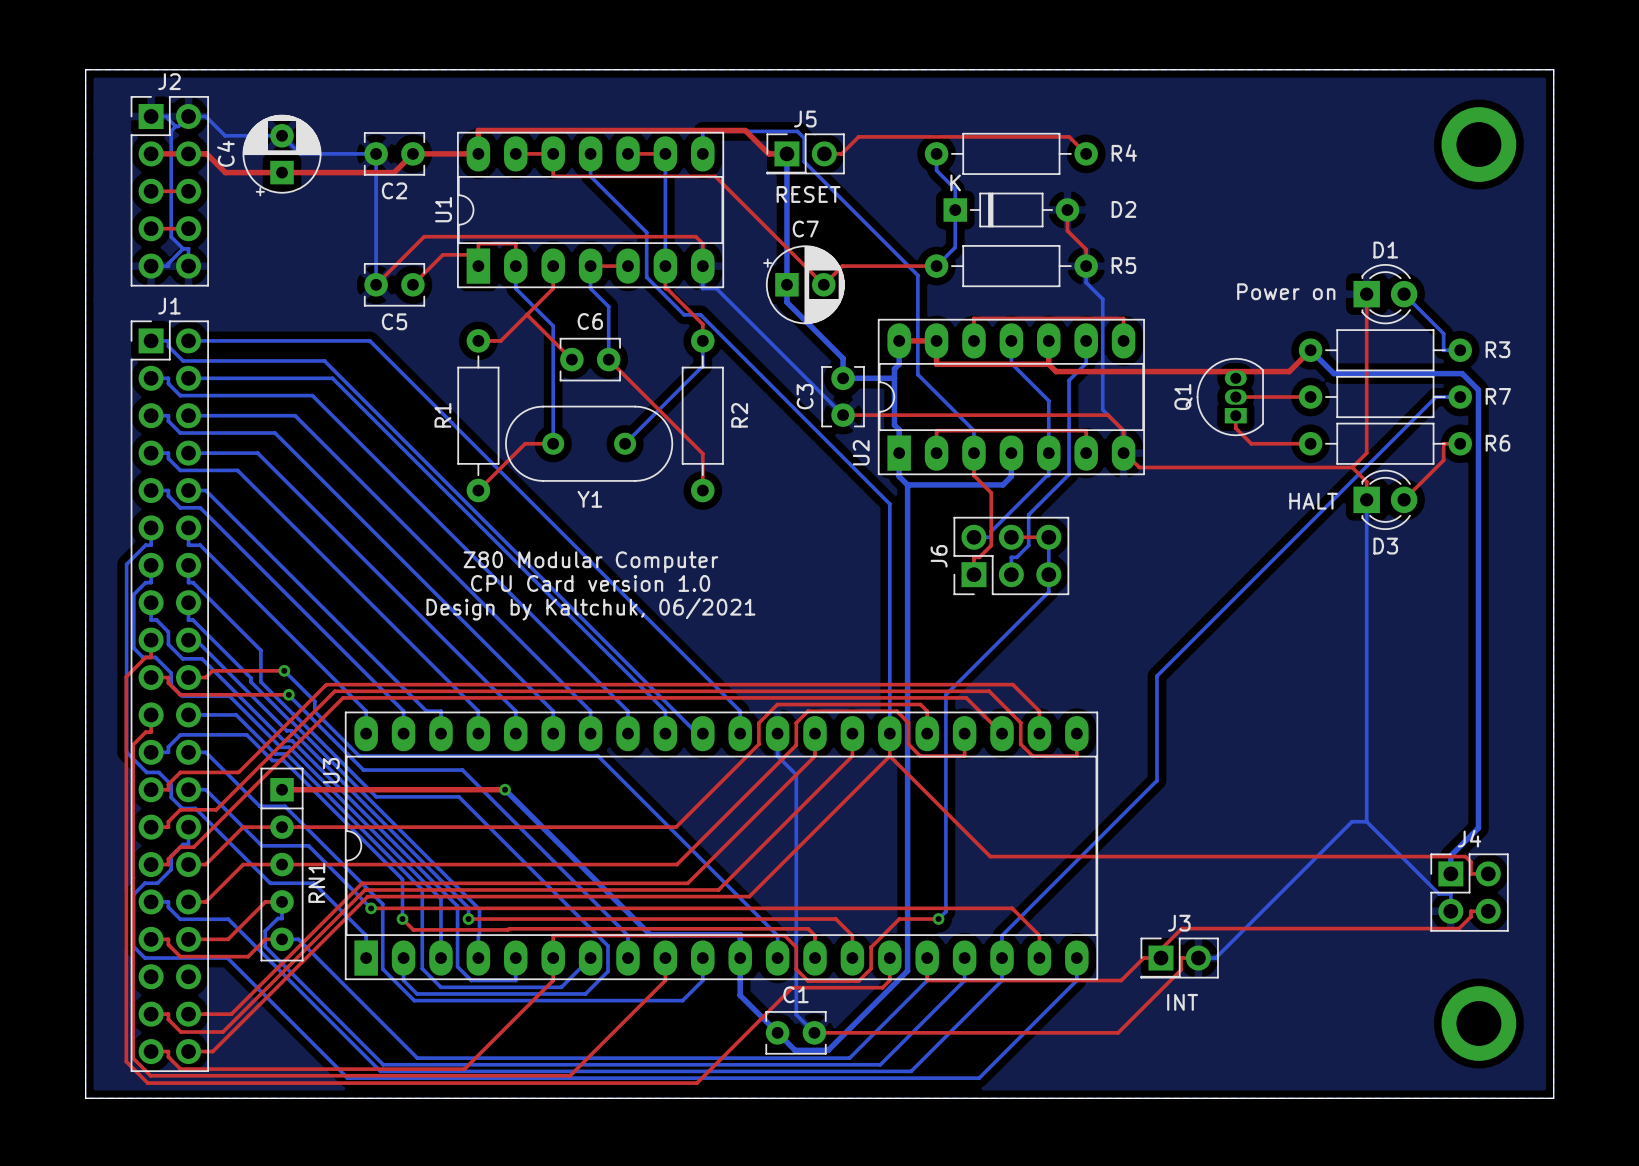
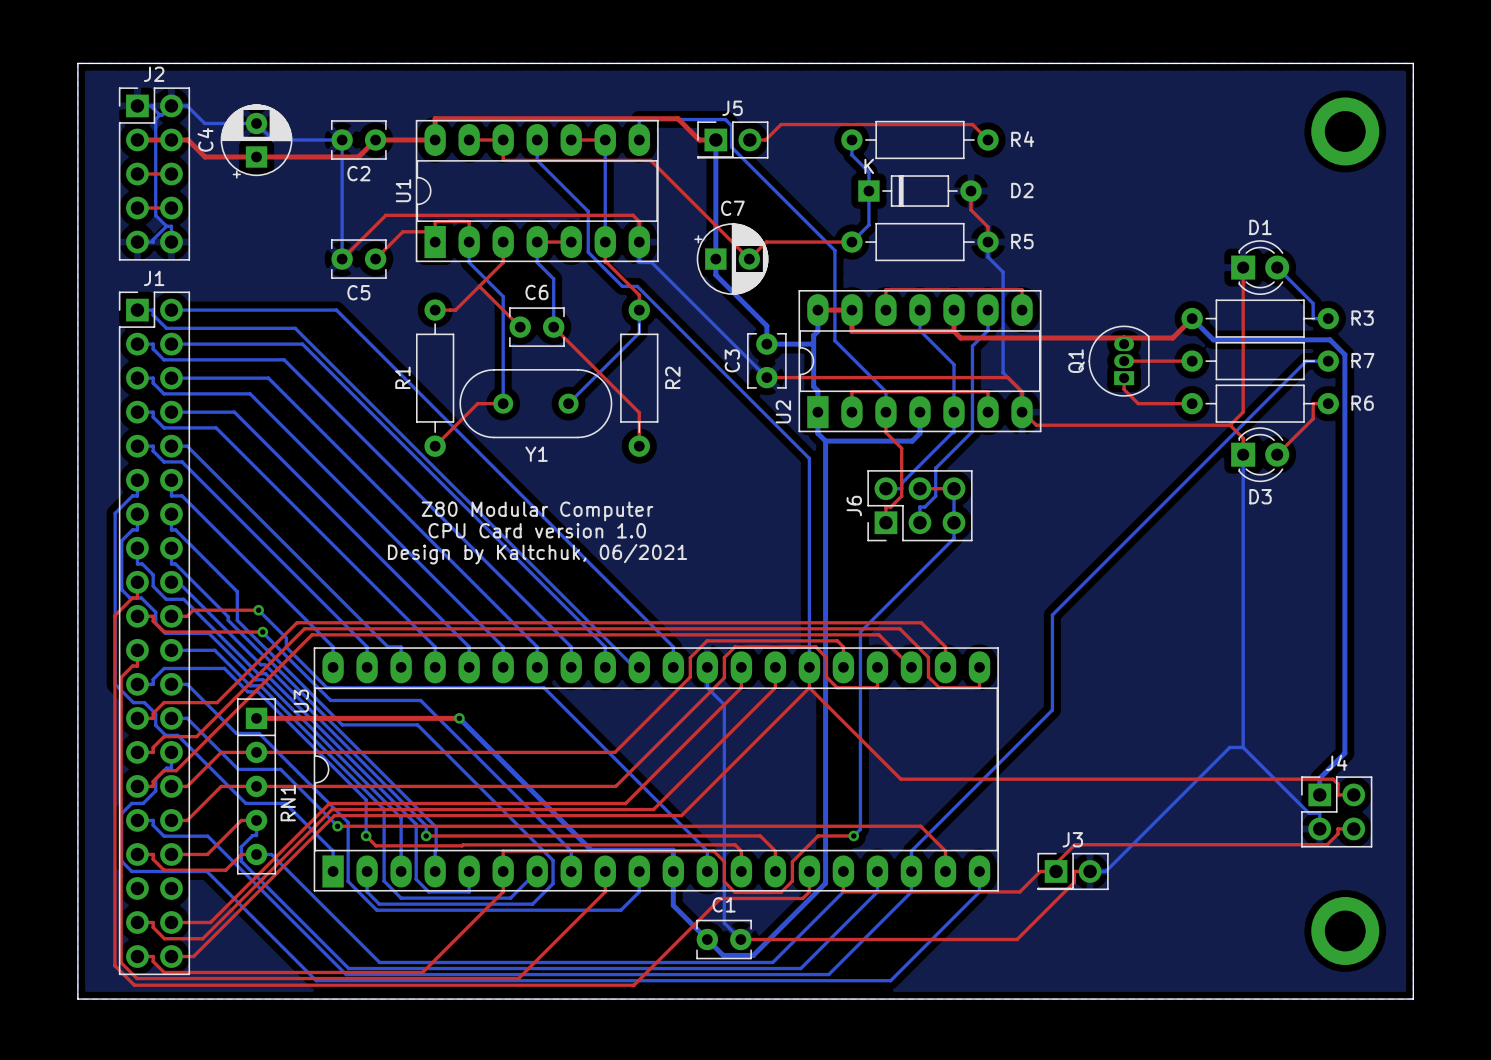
text: RESET (808, 194) -> none
text: Power on (1286, 291) -> none
text: HALT (1313, 501) -> none
text: INT (1182, 1002) -> none

